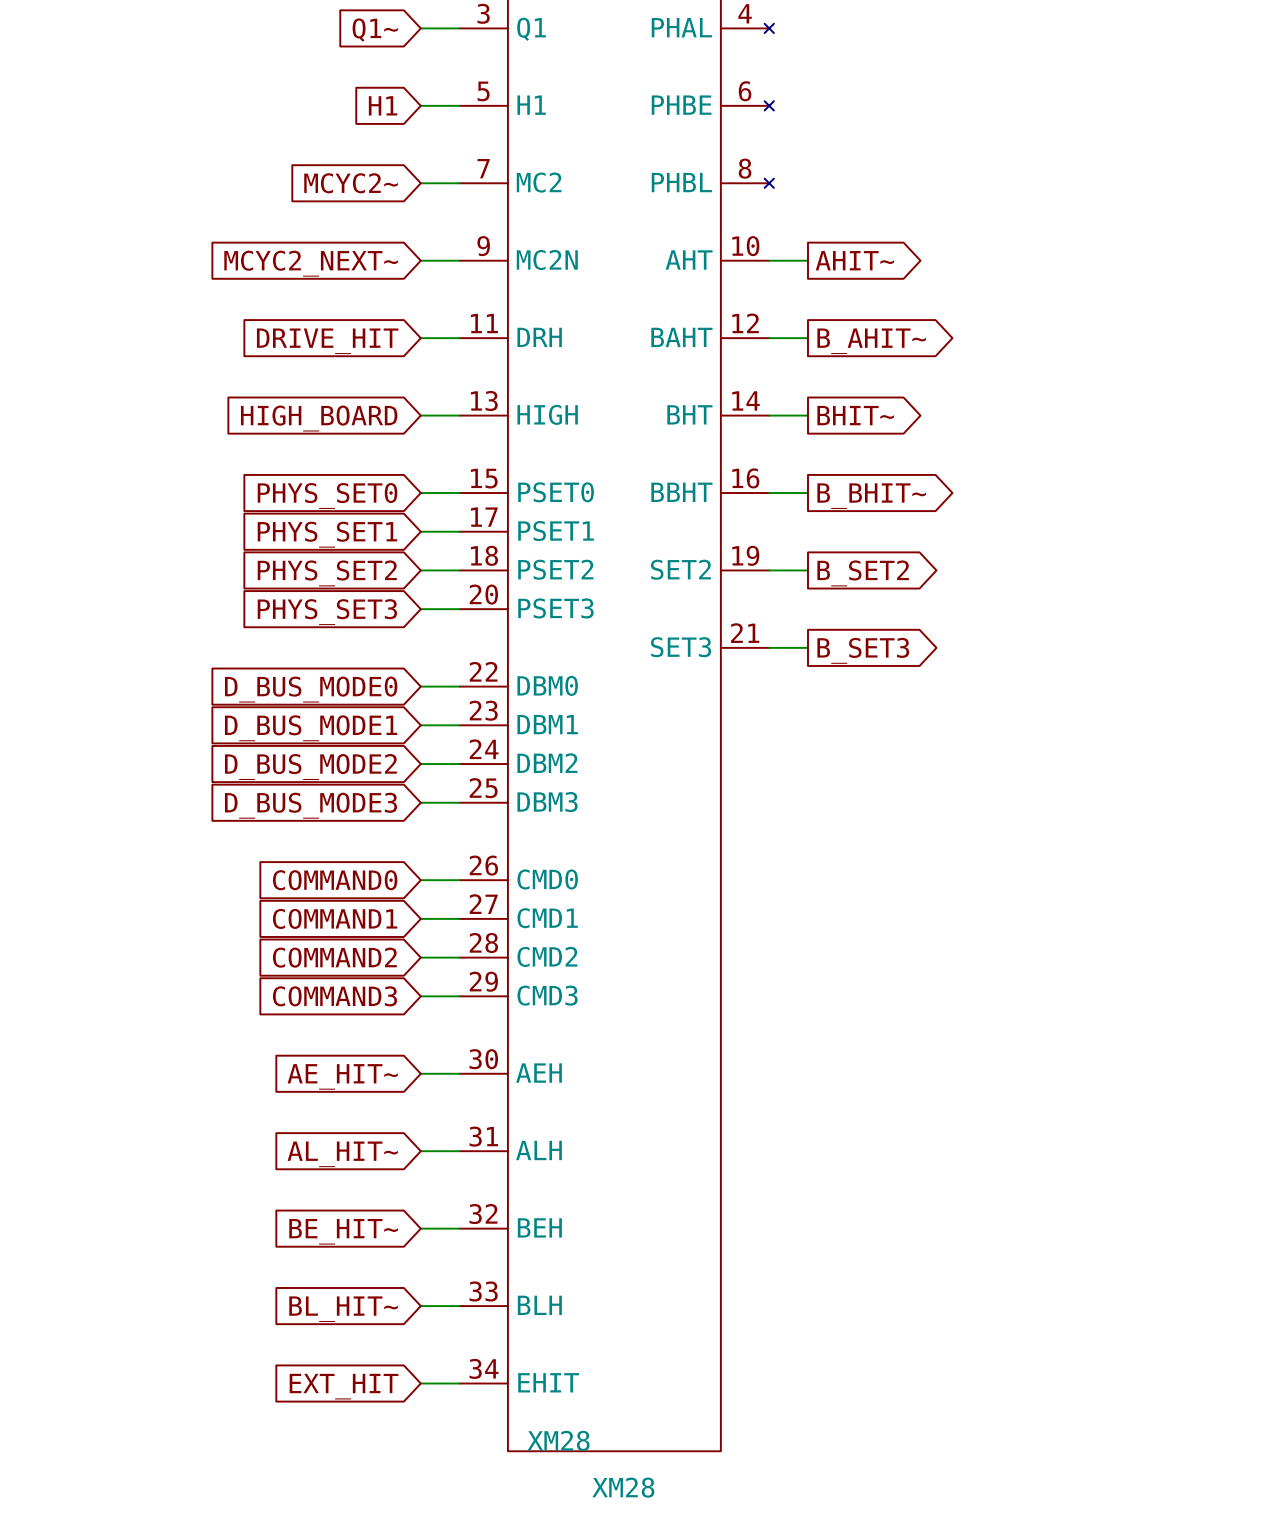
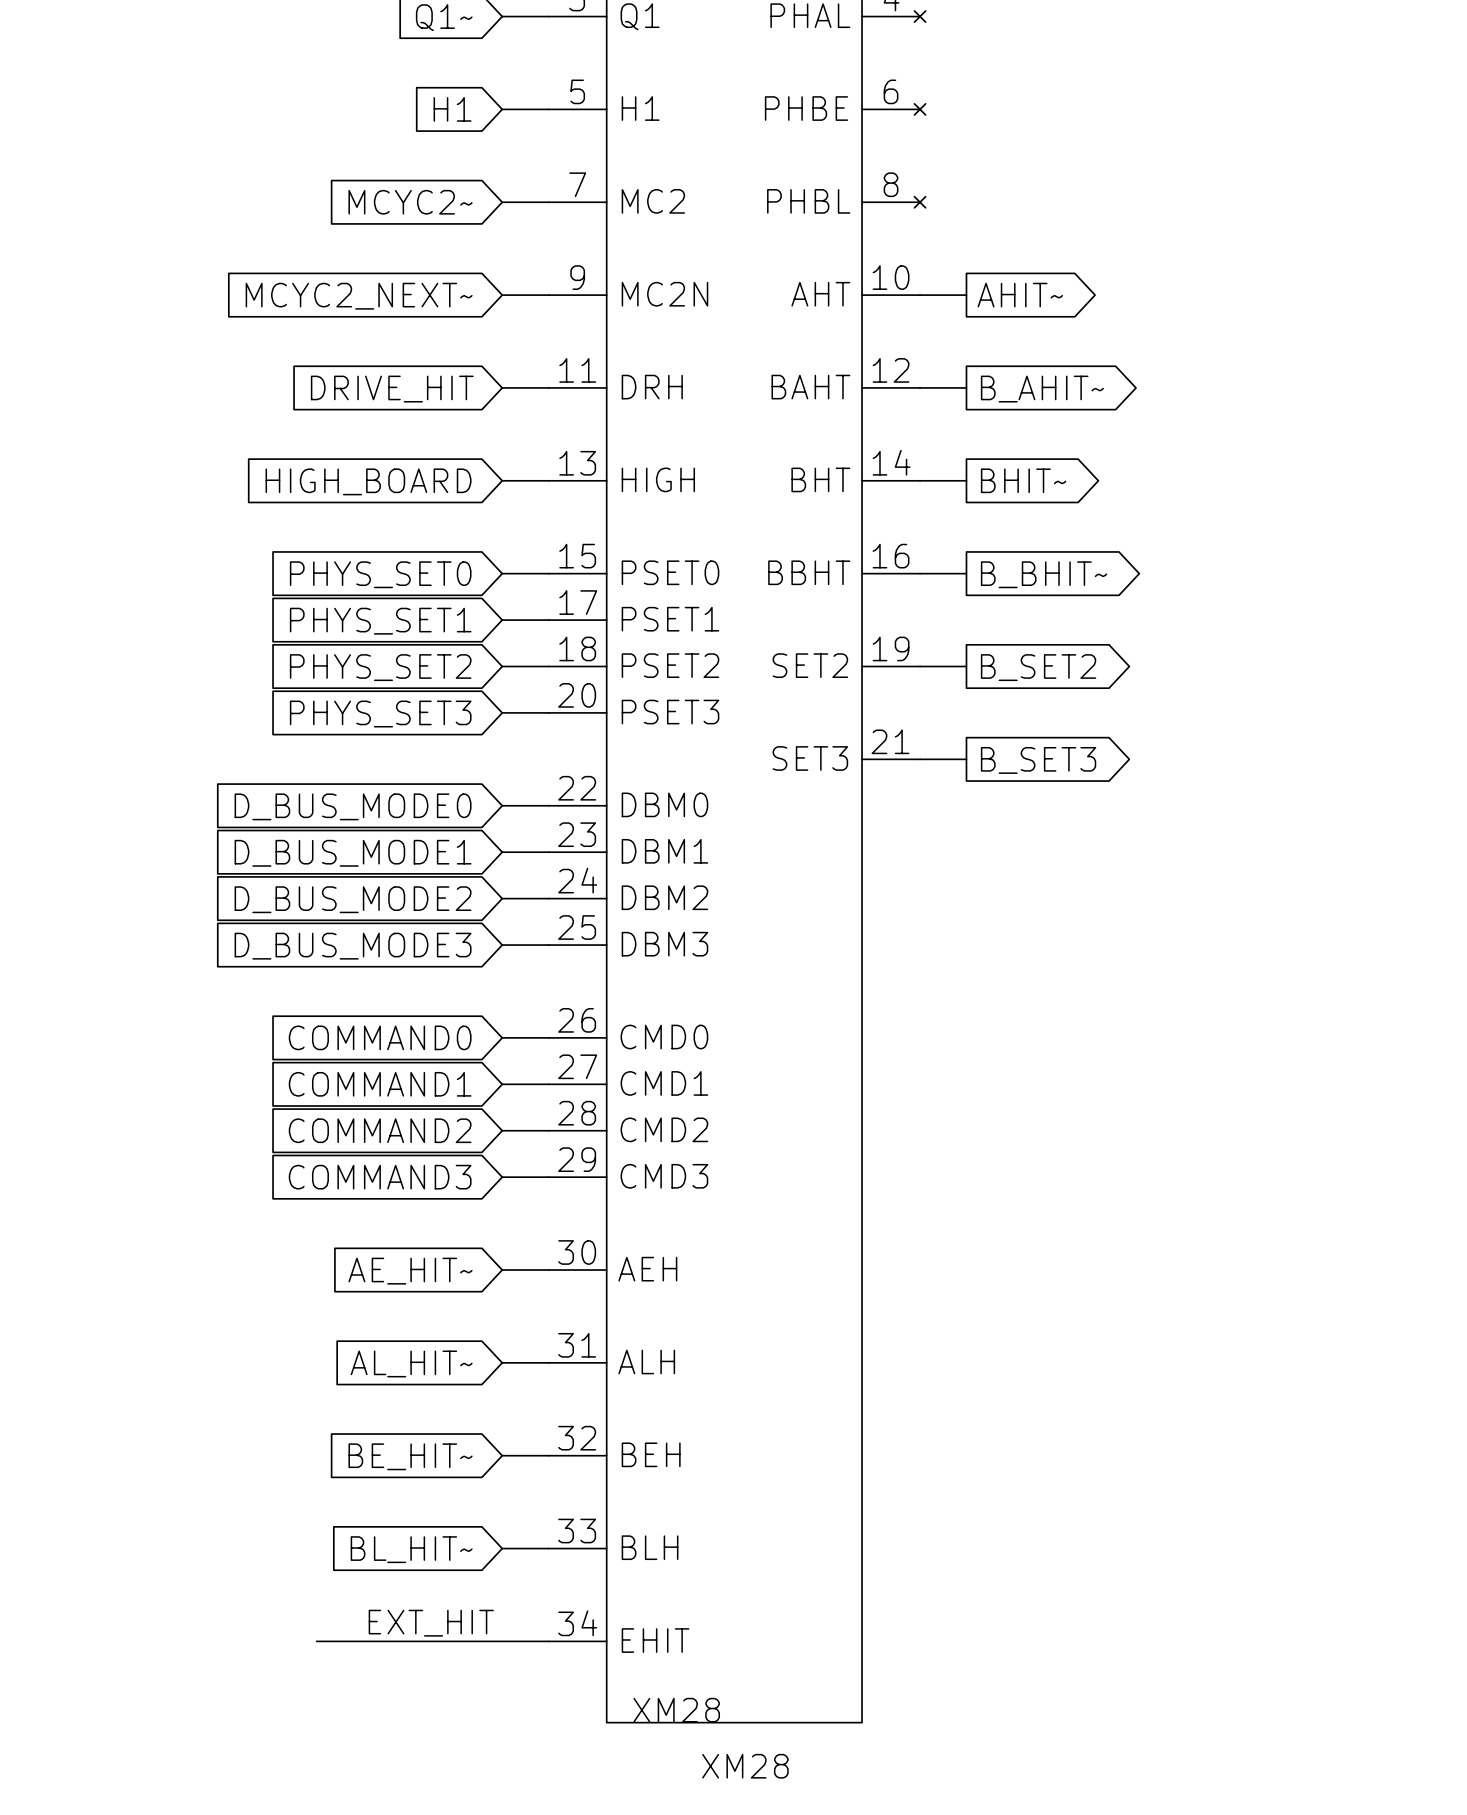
label: none -> EXT_HIT (431, 1623)
wire: none -> (316, 1641) (502, 1641)
global label: EXT_HIT (344, 1386) -> none

